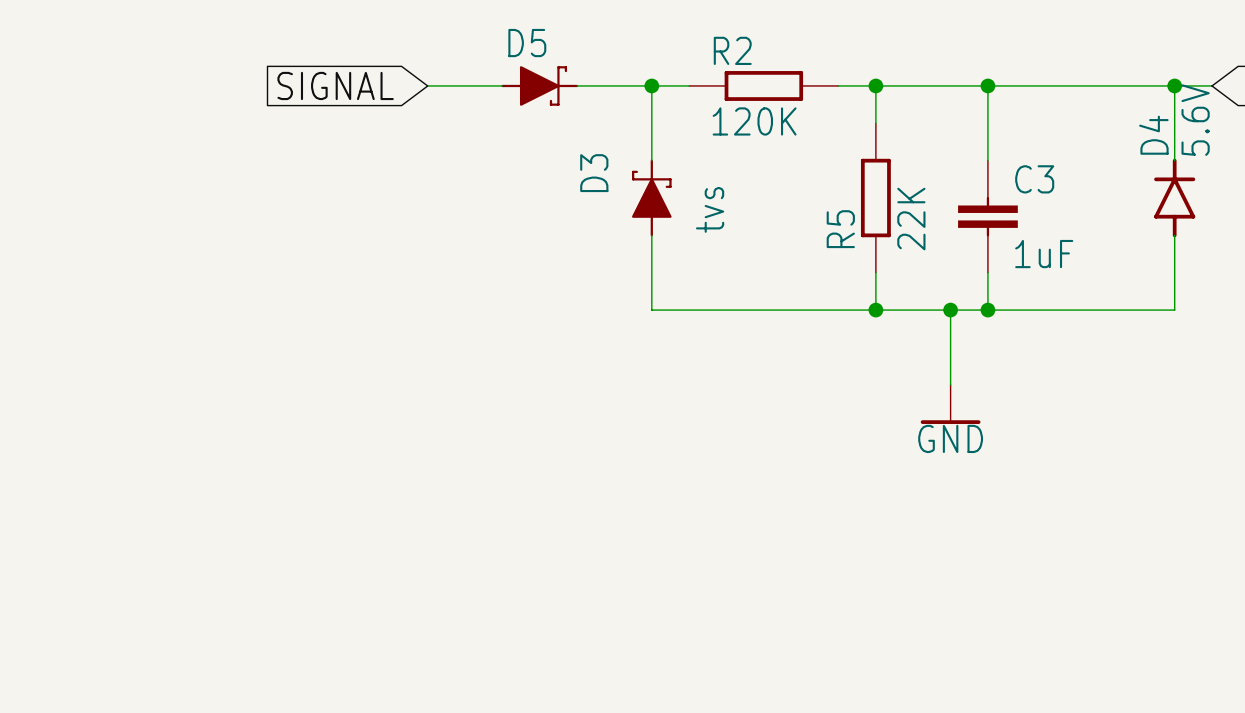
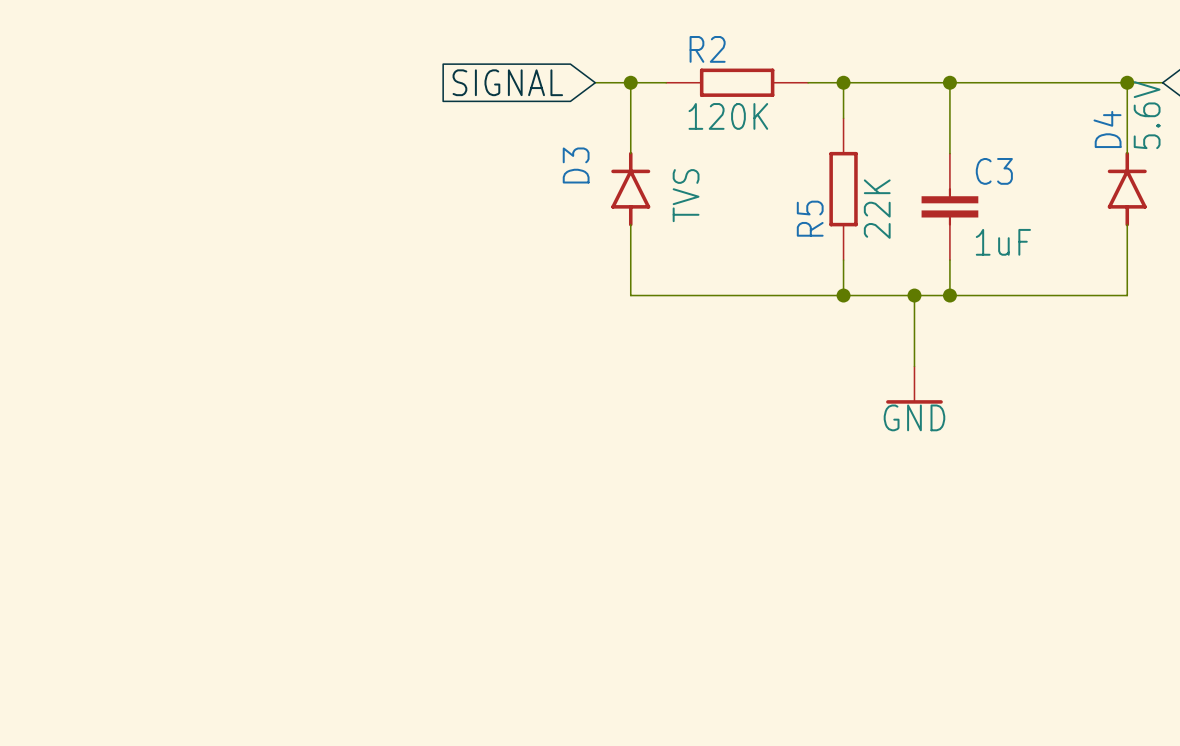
global label position: SIGNAL (335, 85) -> SIGNAL (507, 82)
wire: (427, 85) (502, 85) -> none
D5: (539, 85) -> none
wire: (577, 85) (614, 85) -> none
D3 symbol: [632, 159, 672, 237] -> [611, 151, 651, 227]
D3 value: tvs (710, 209) -> TVS (686, 195)

